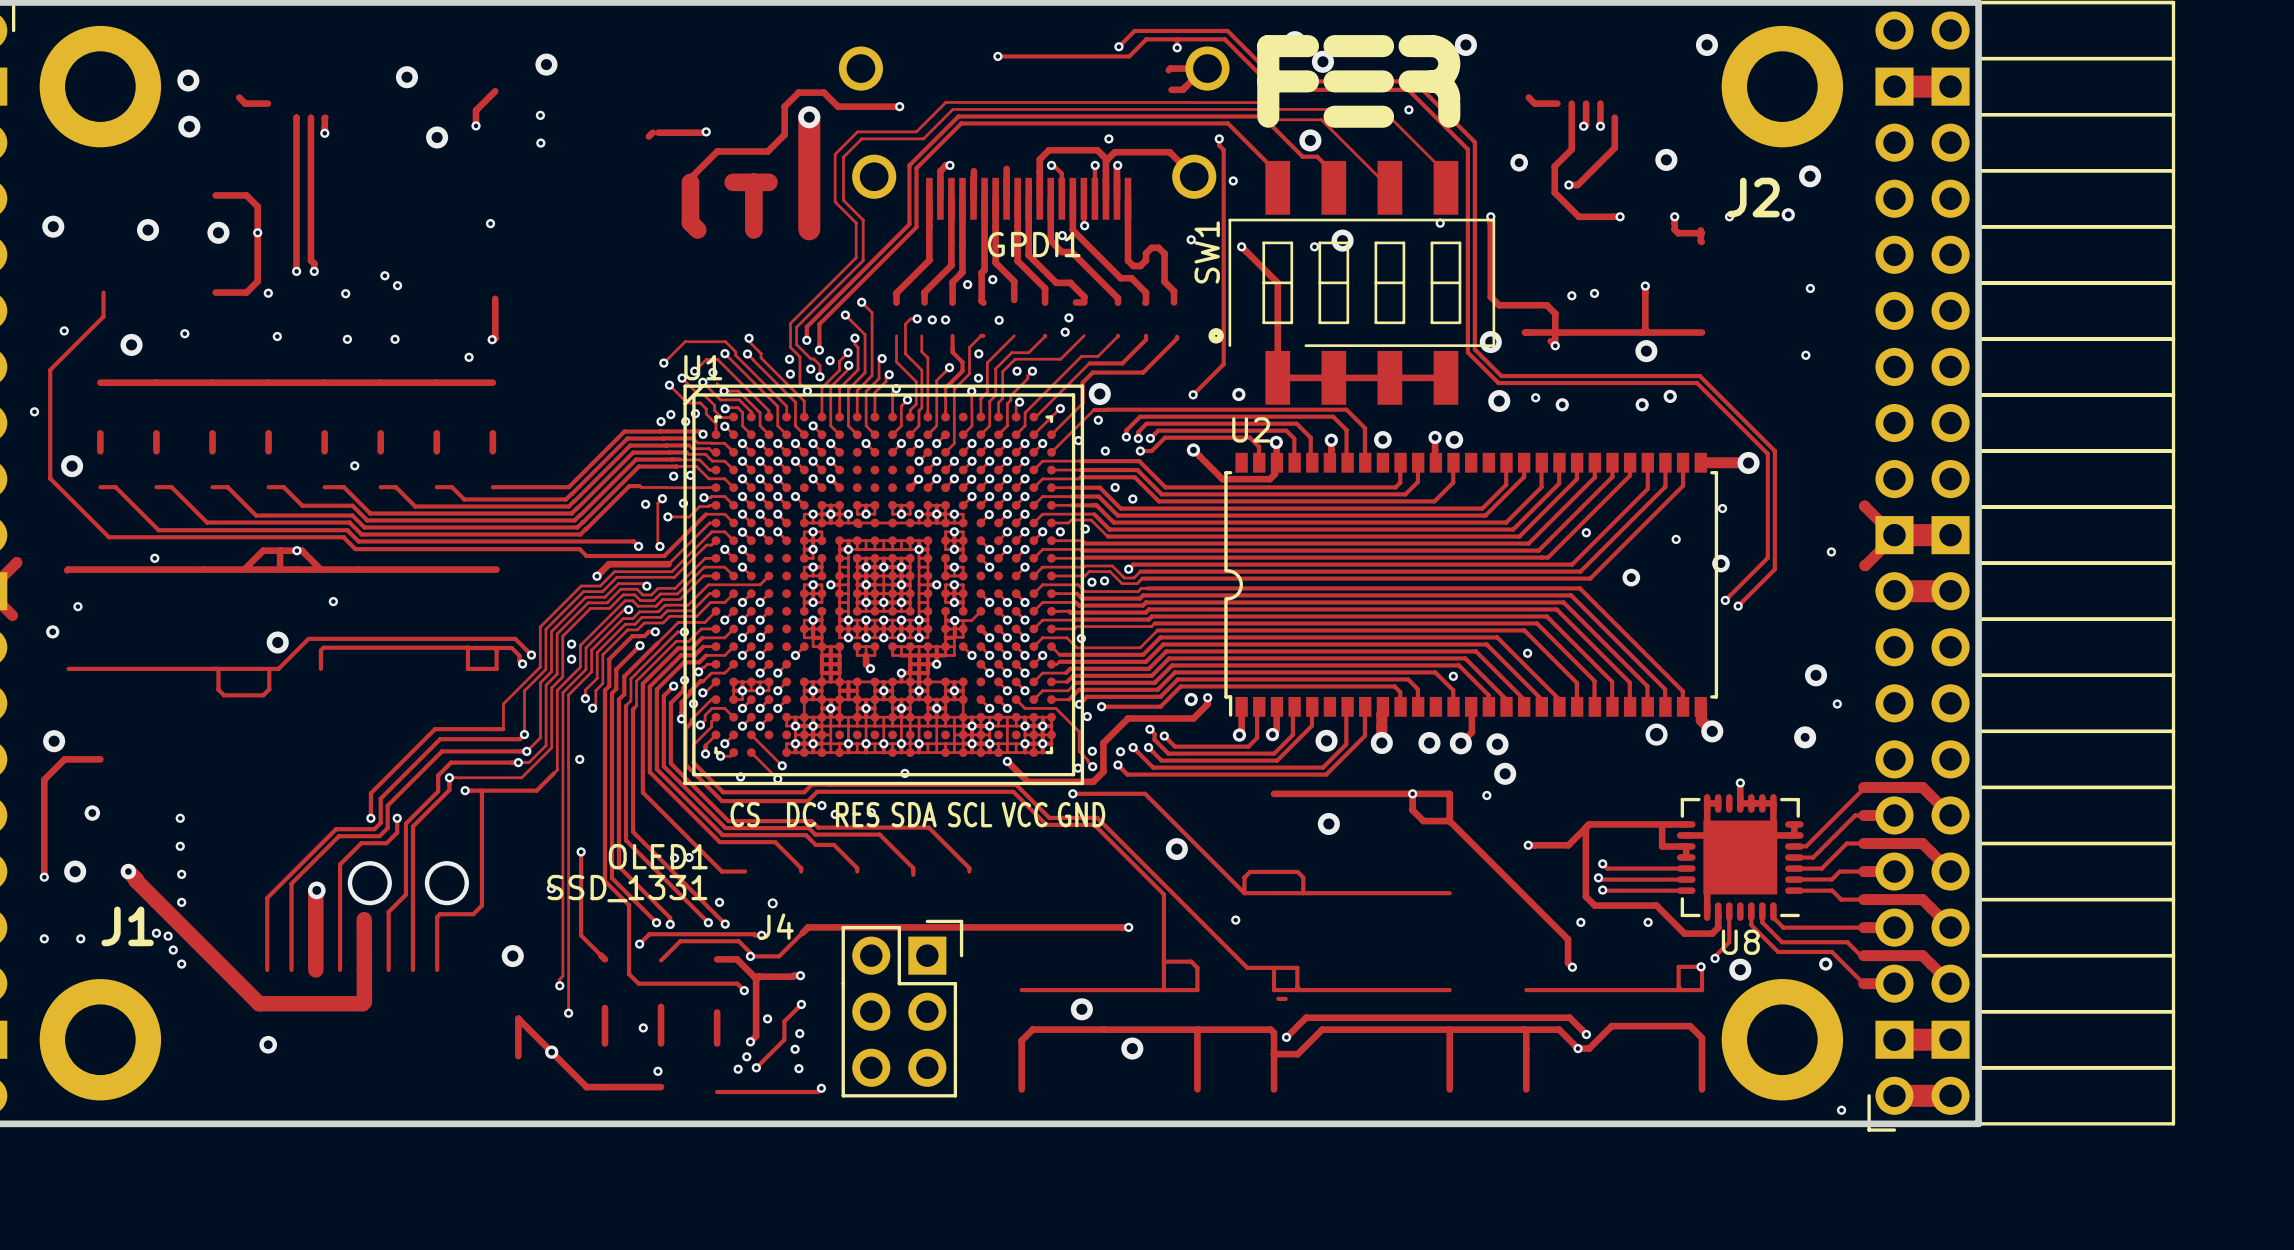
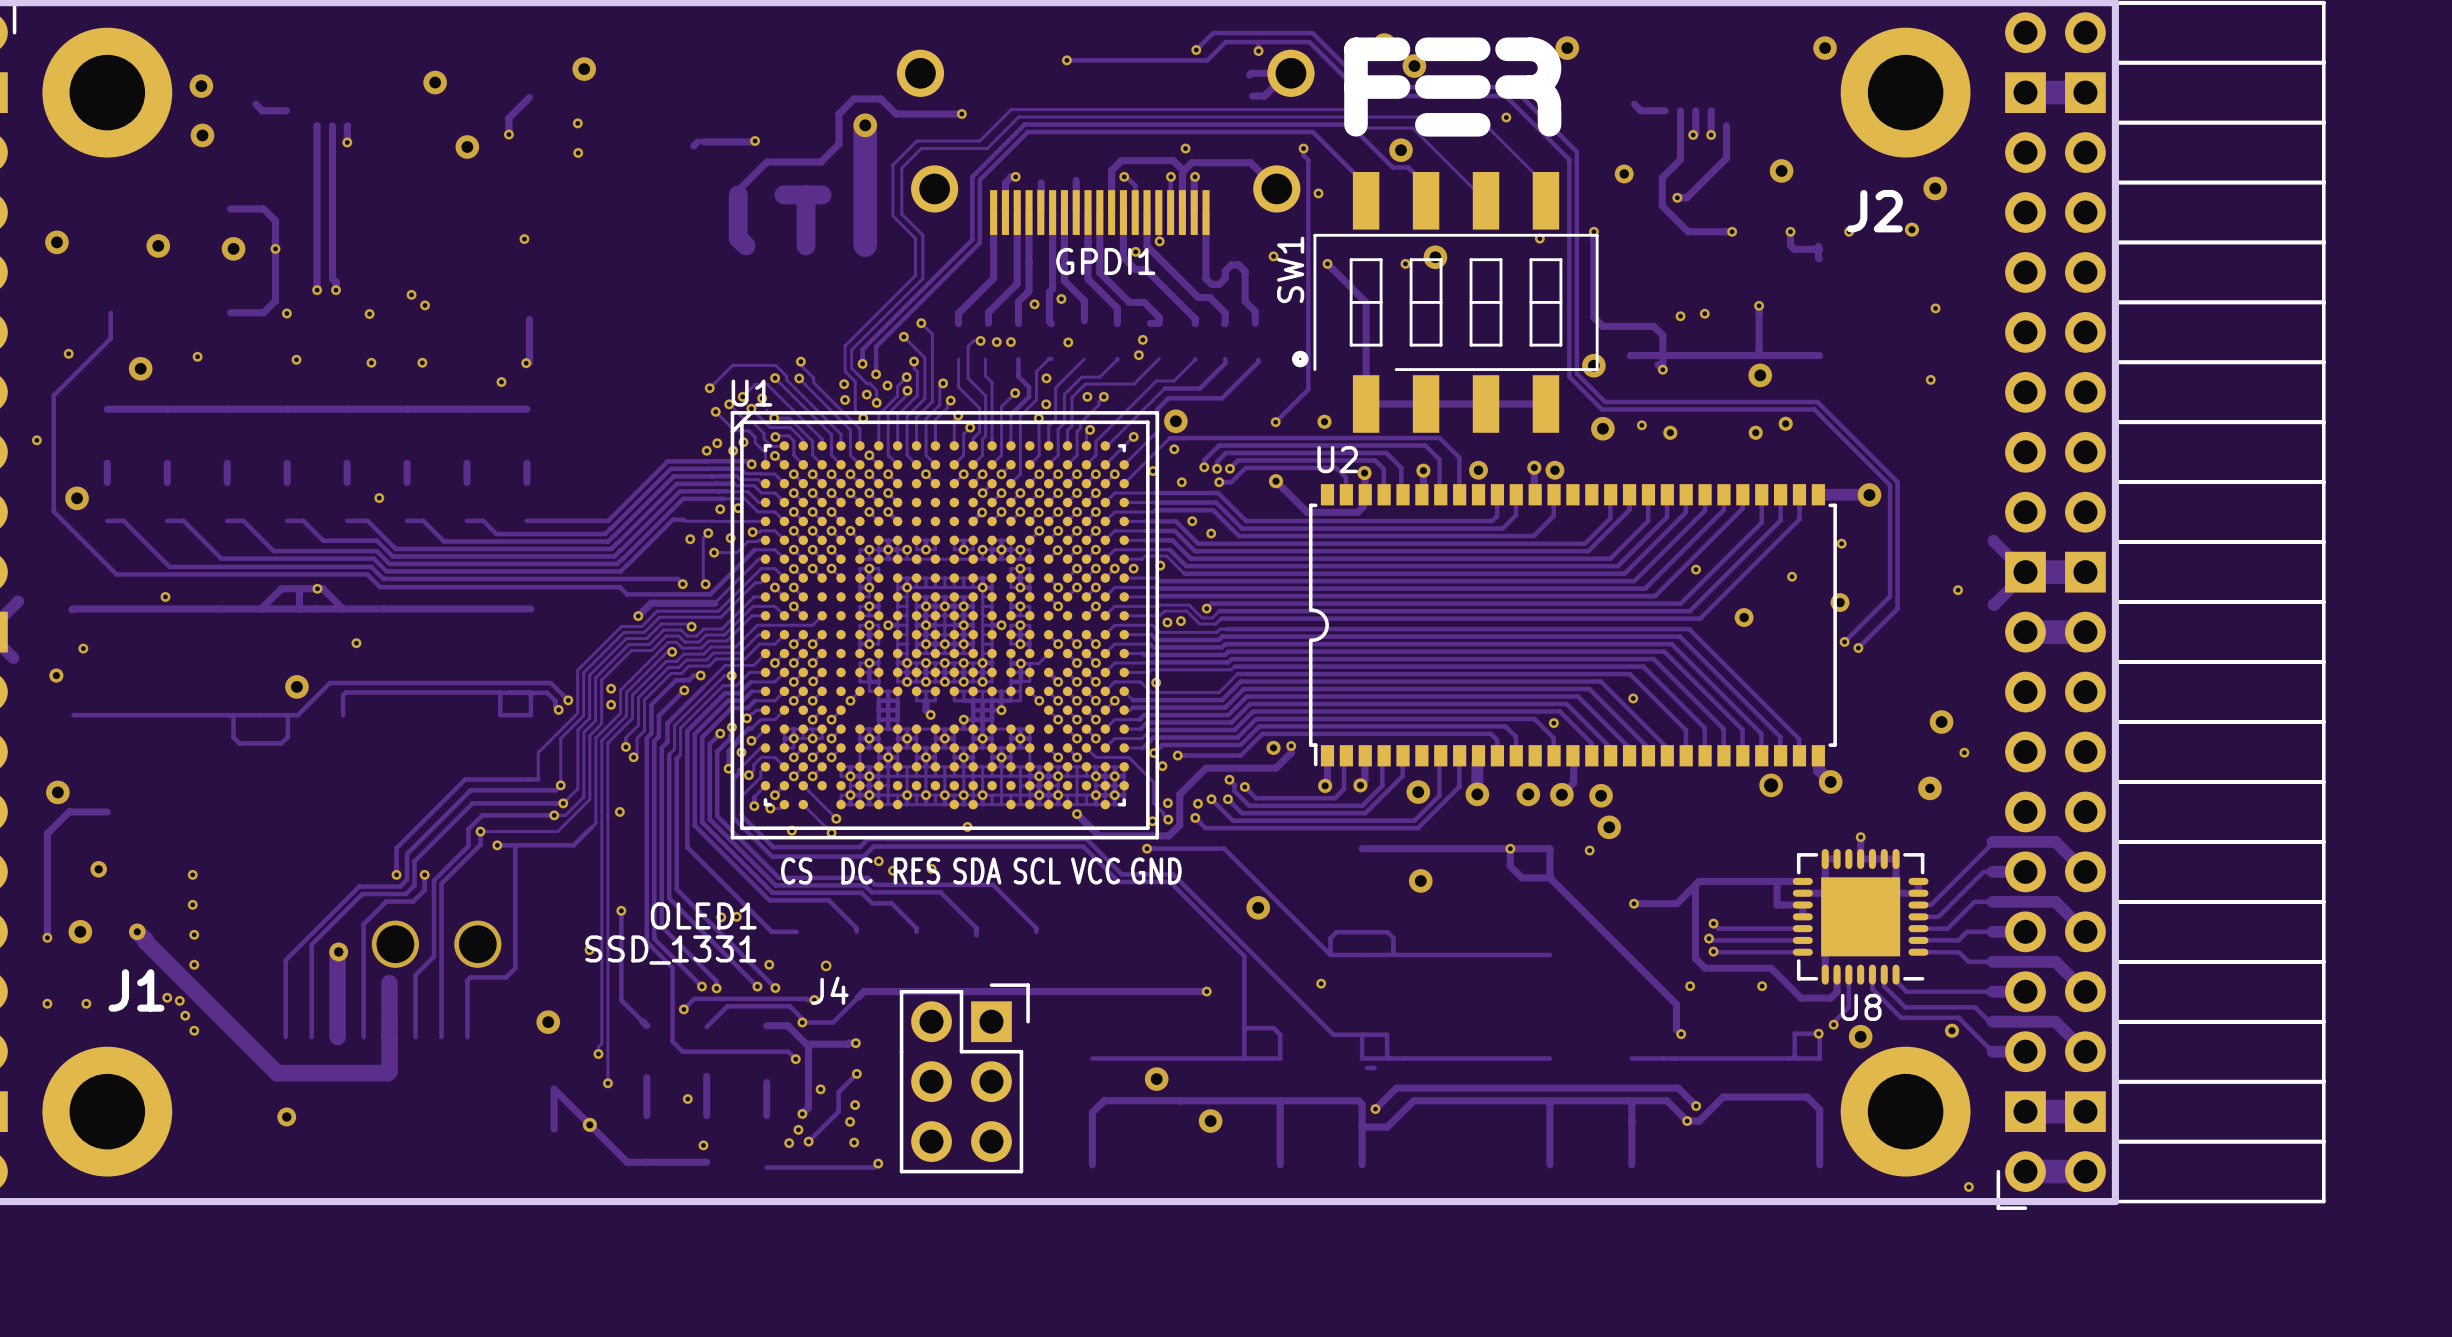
via: none -> (907, 738)

